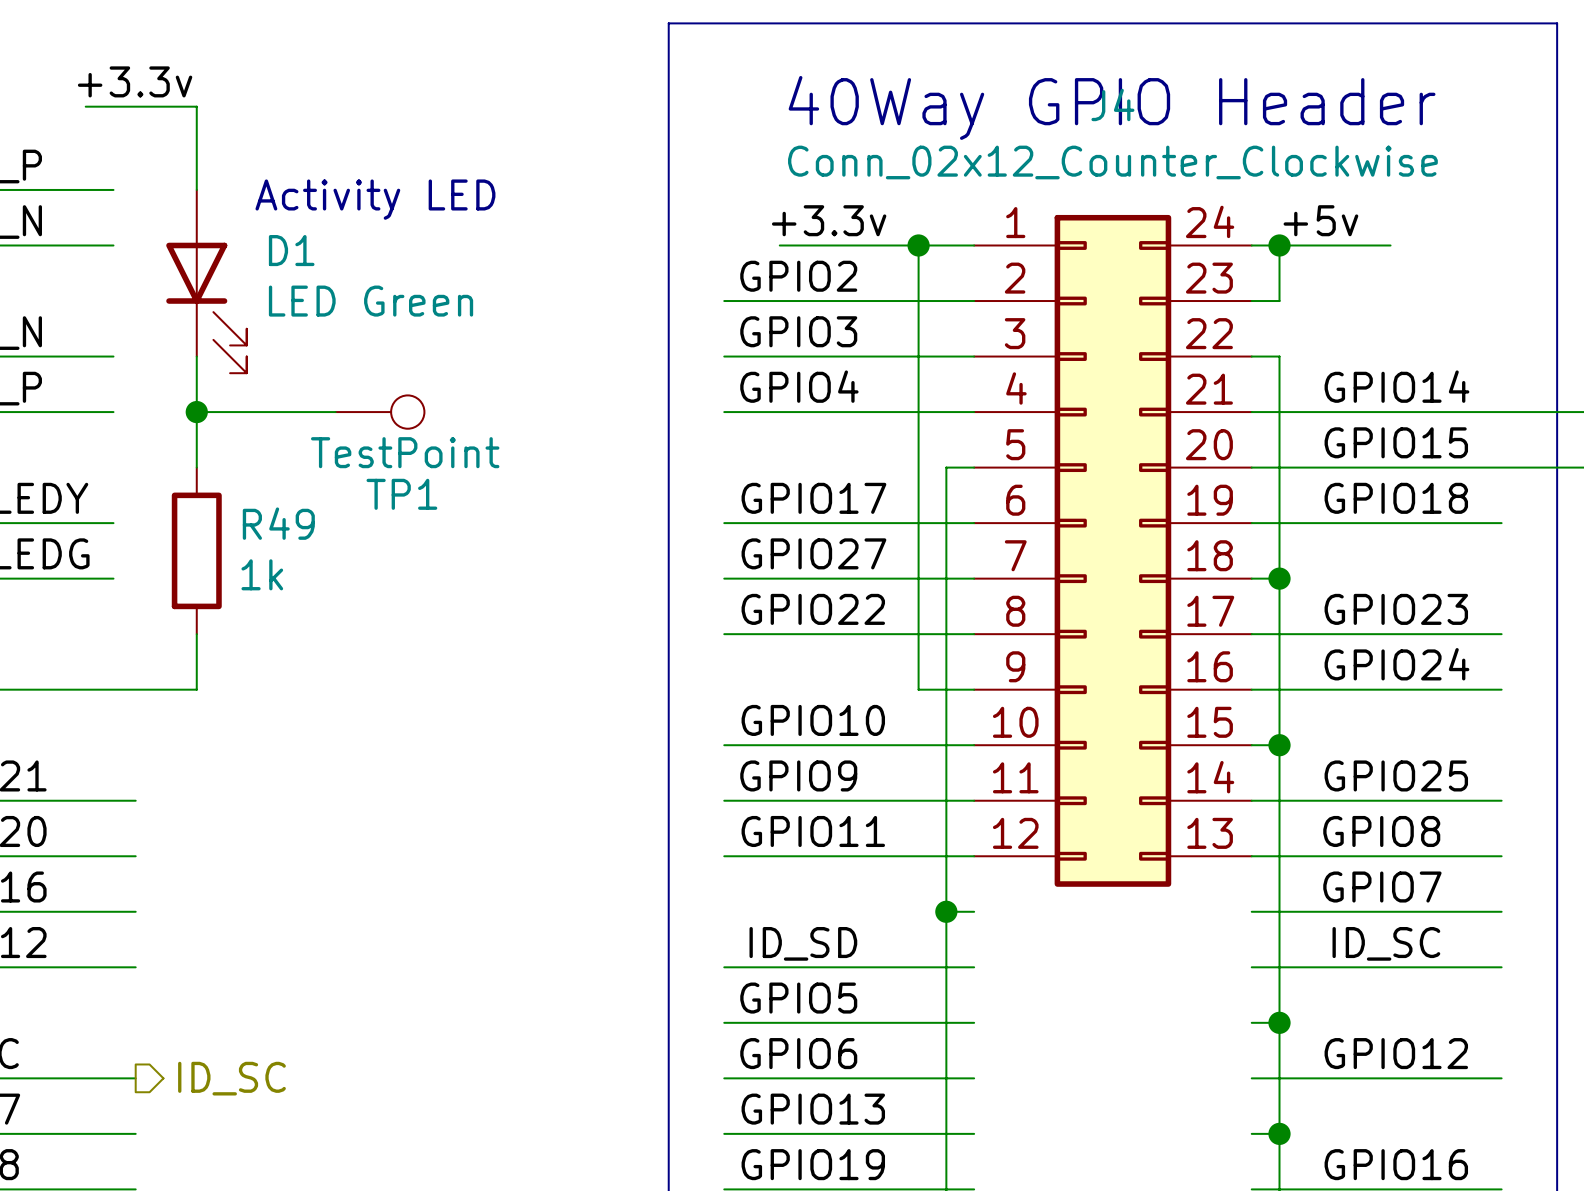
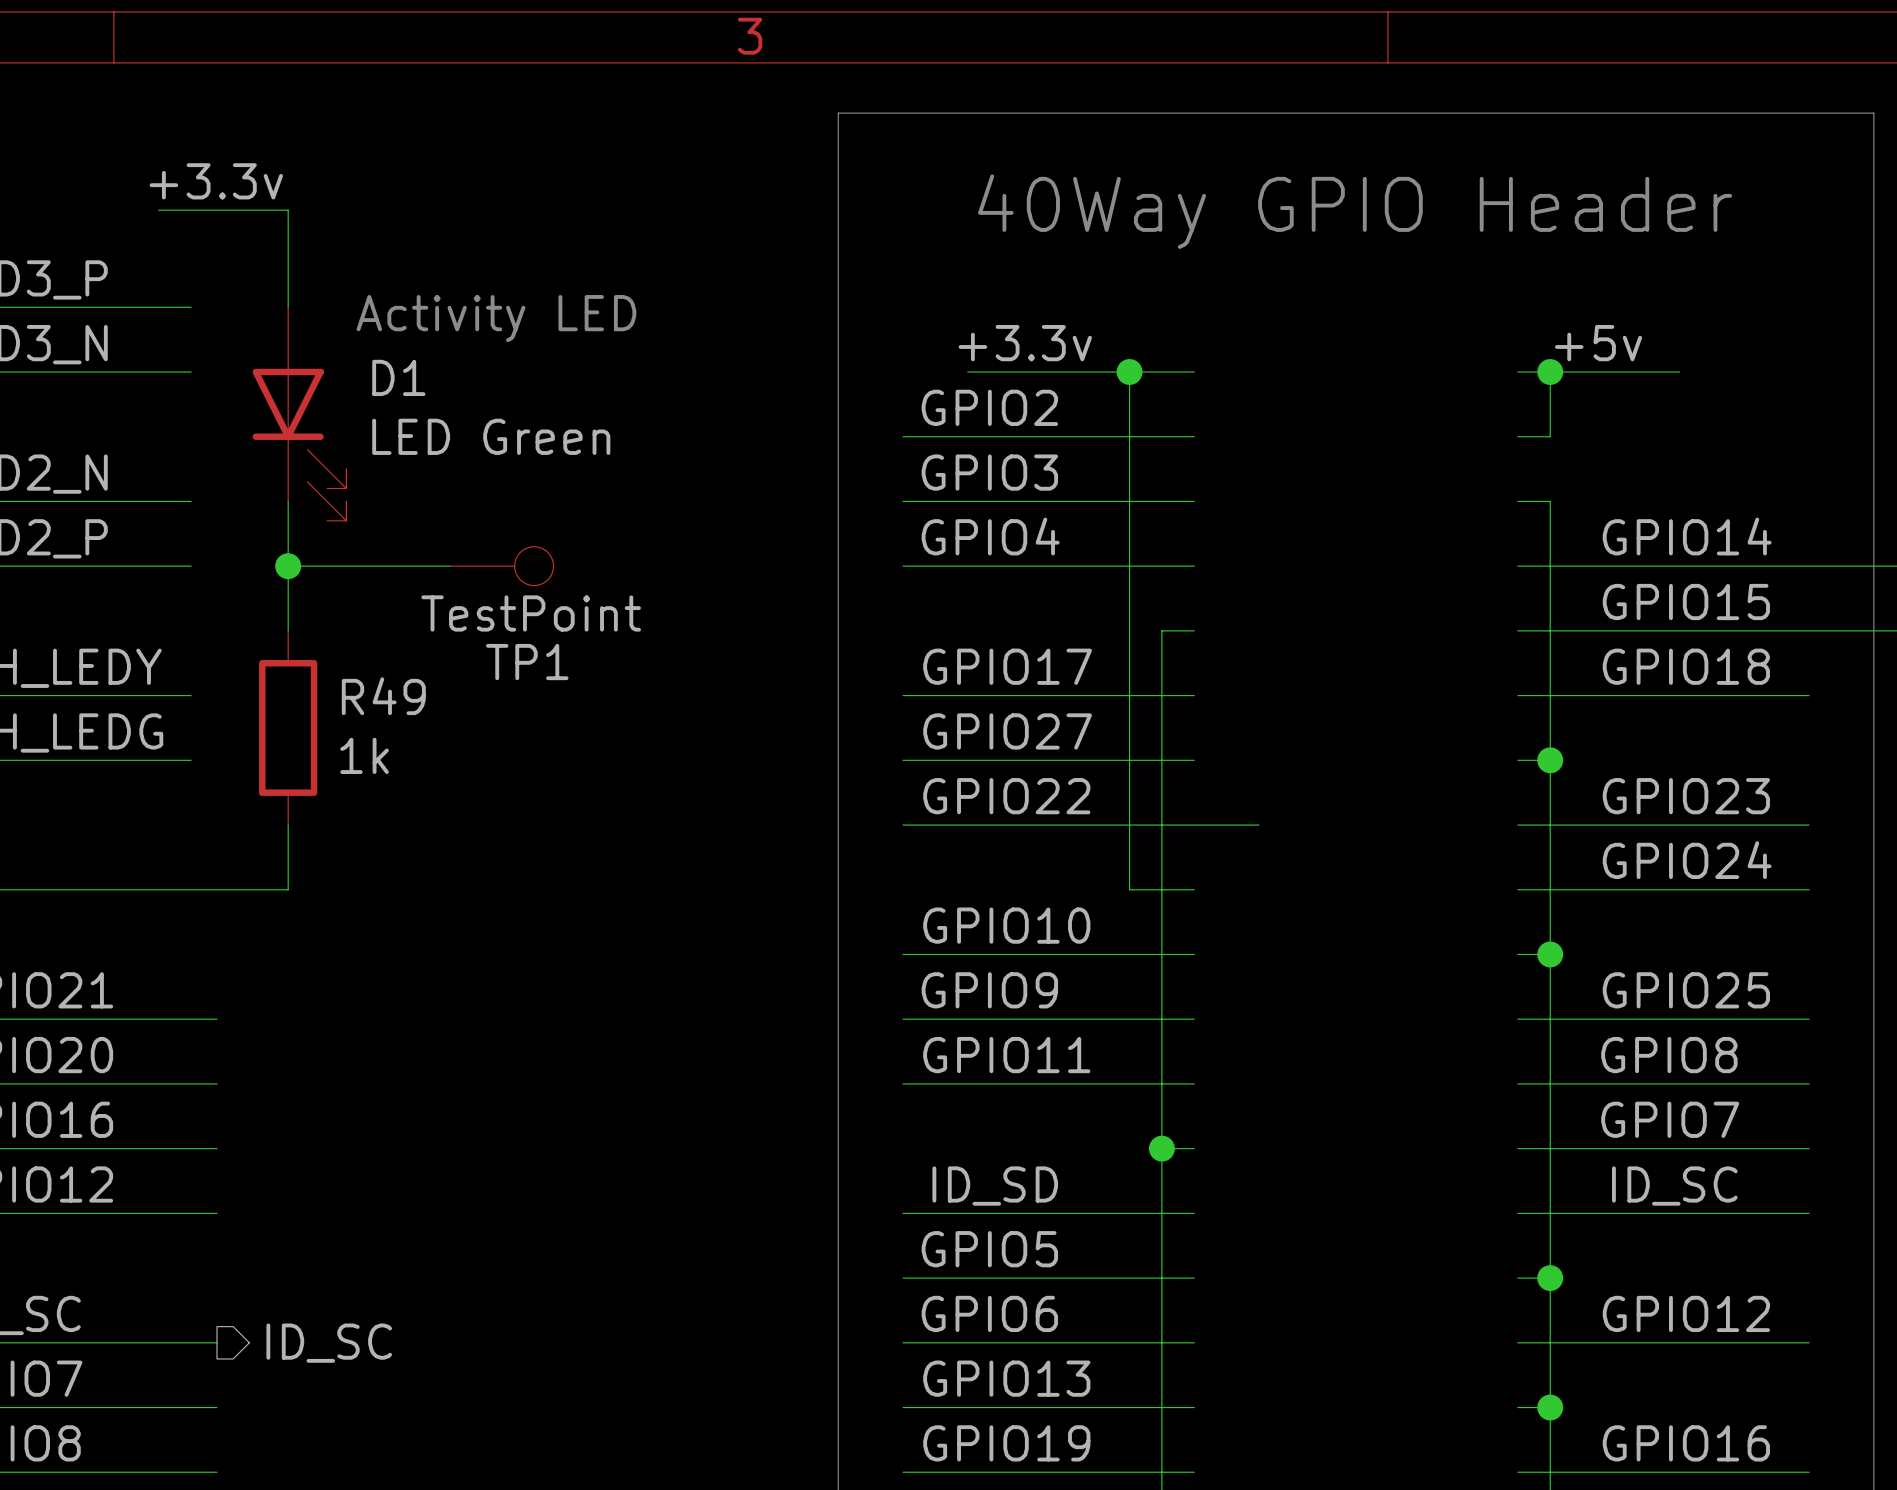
J4: Conn_02x12_Counter_Clockwise (1112, 550) -> none

